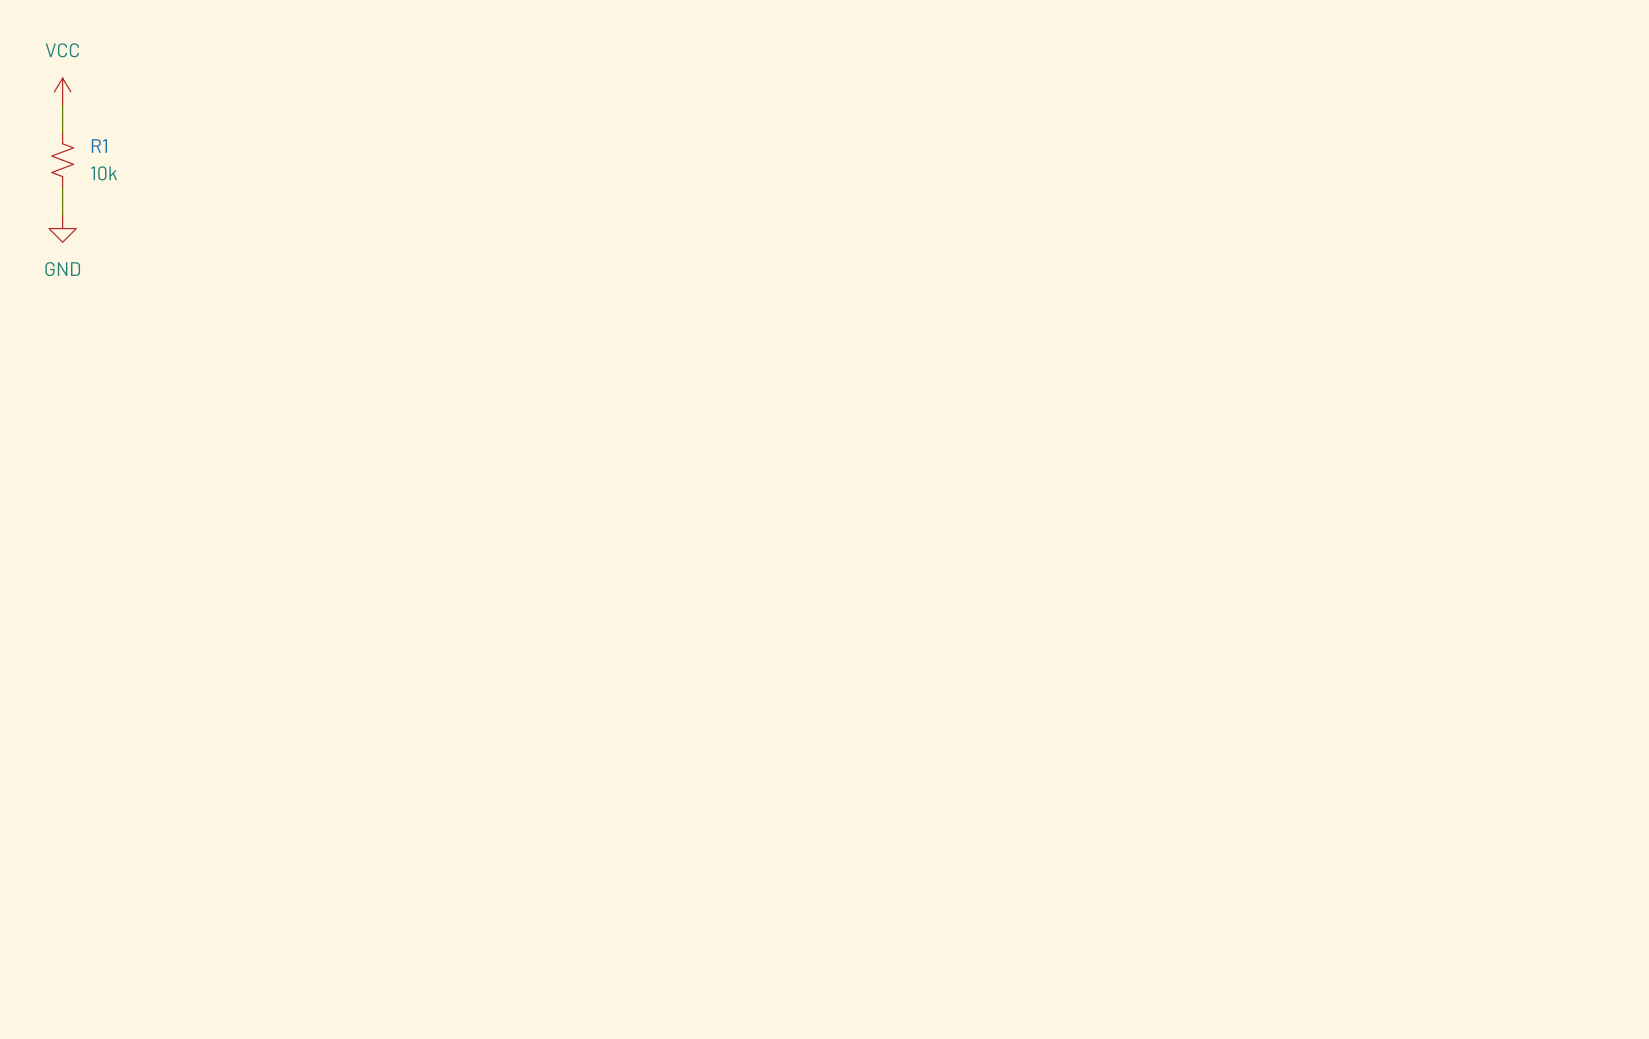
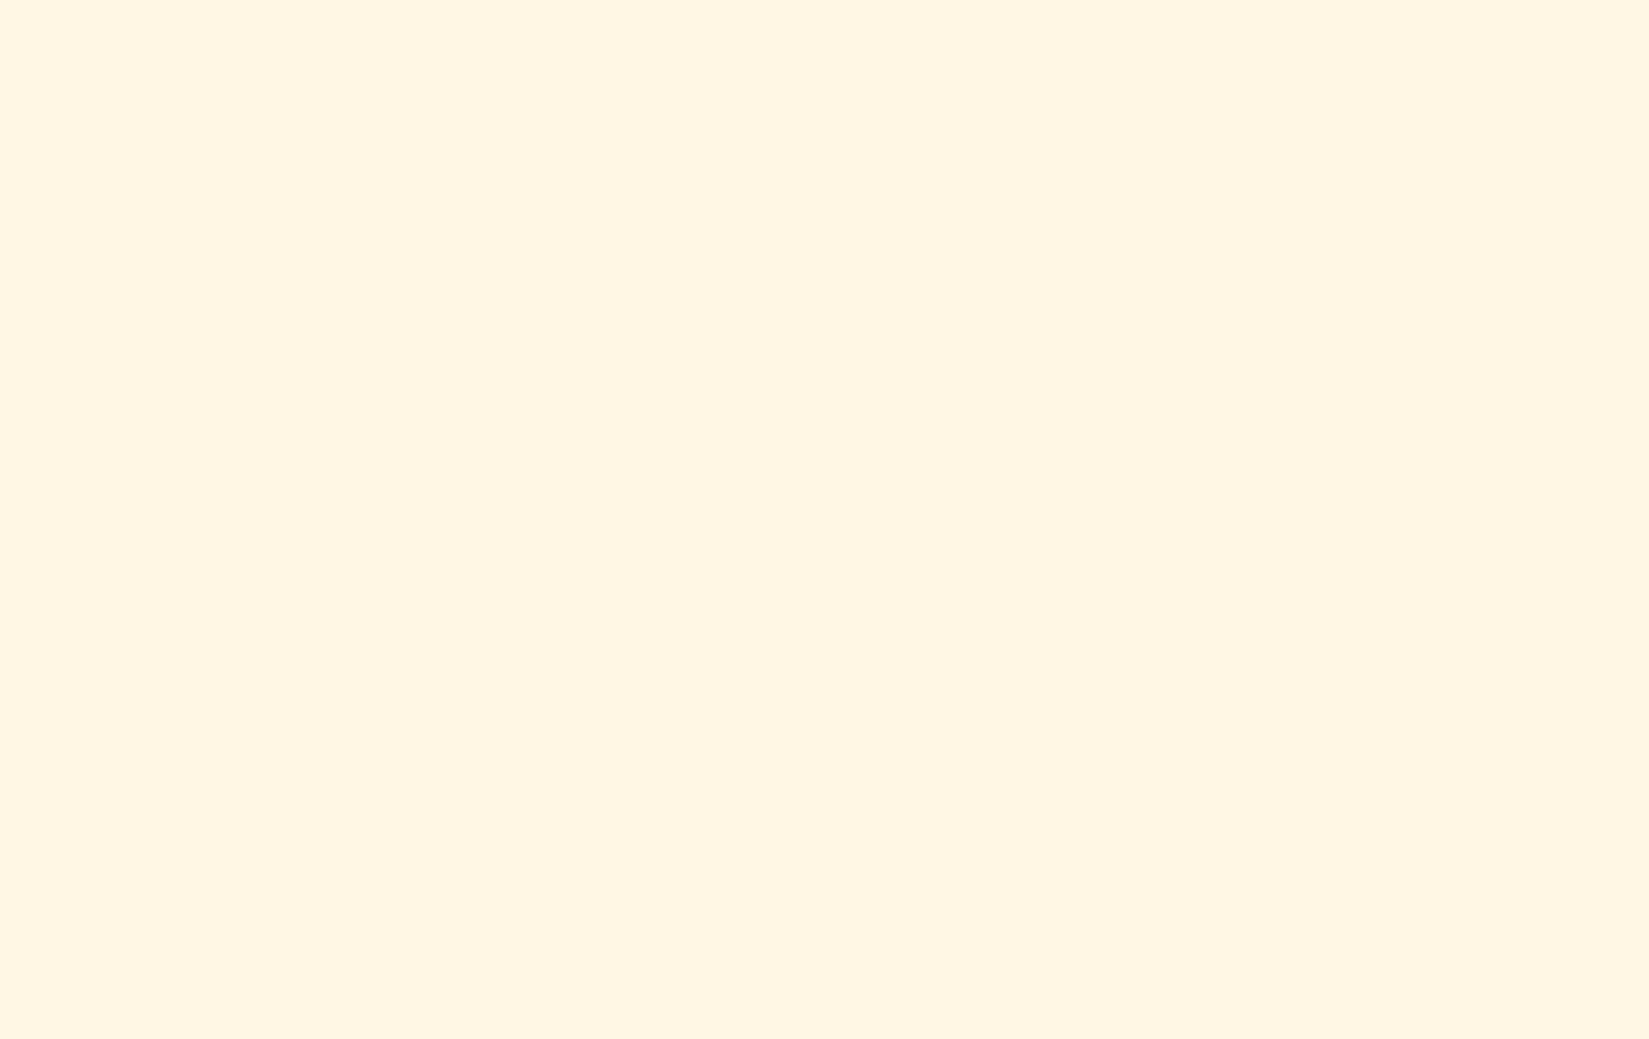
power symbol: VCC (62, 91) -> none
wire: (62, 105) (62, 132) -> none
R1: 10k (62, 160) -> none
wire: (62, 187) (62, 214) -> none
power symbol: GND (62, 228) -> none

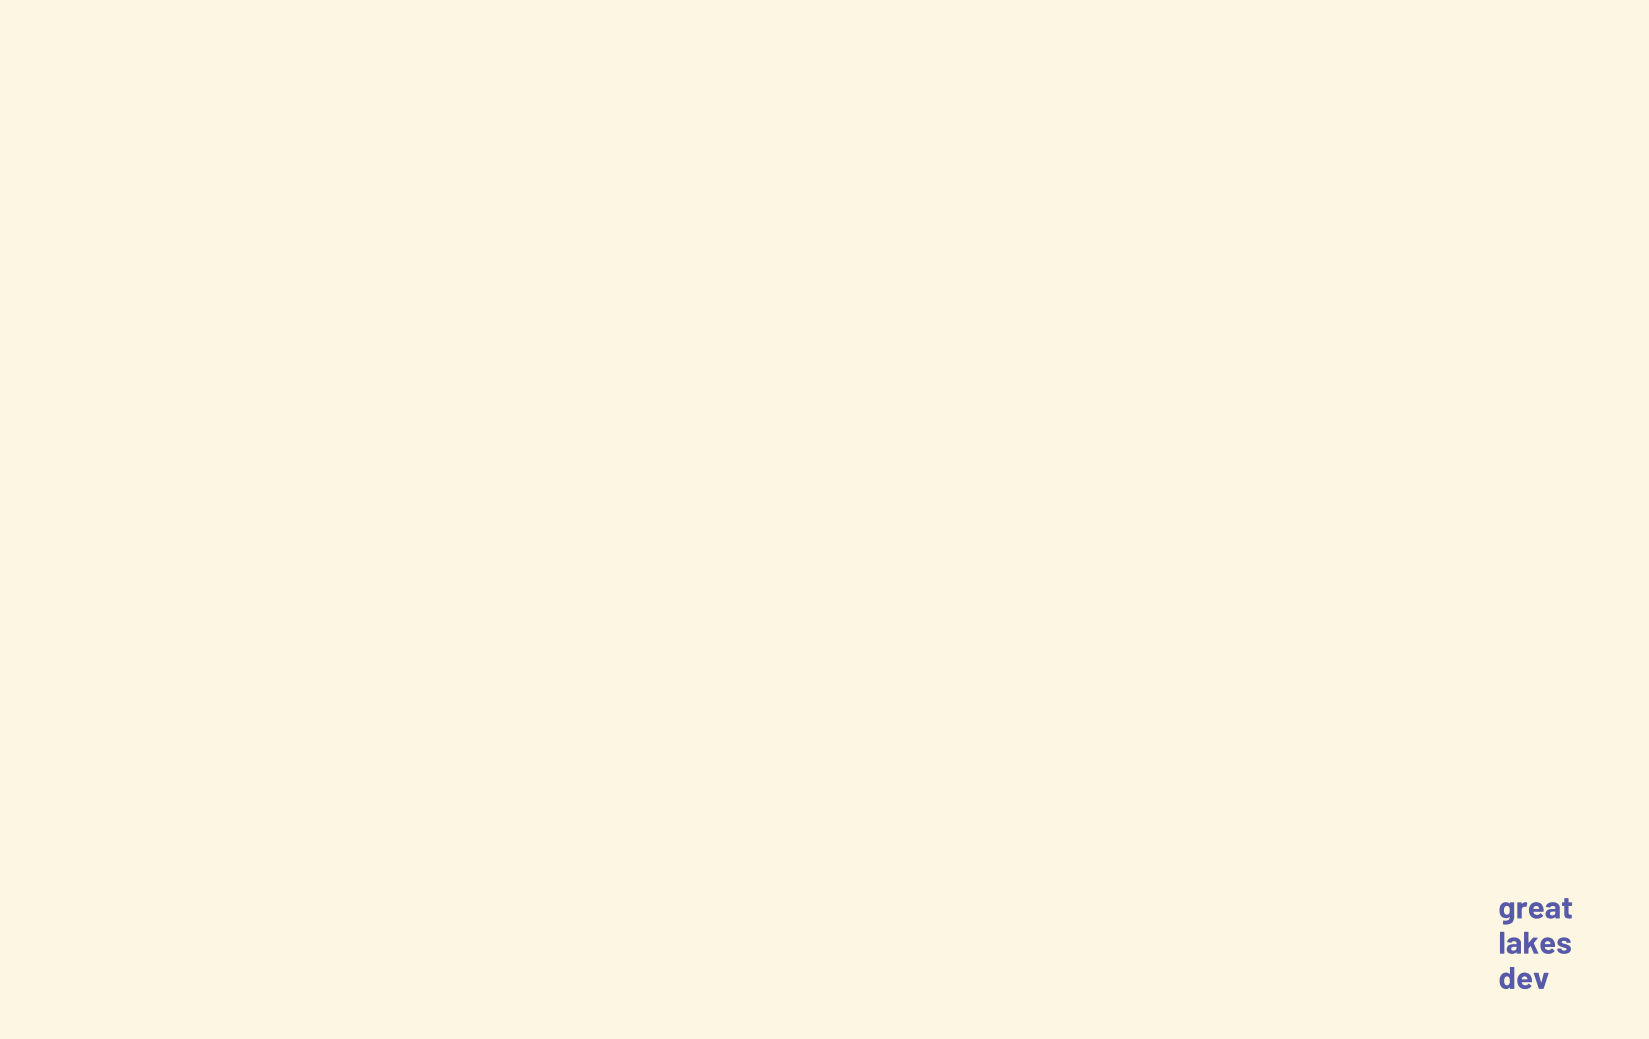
text: none -> great (1535, 911)
text: none -> lakes (1535, 942)
text: none -> dev (1524, 978)

